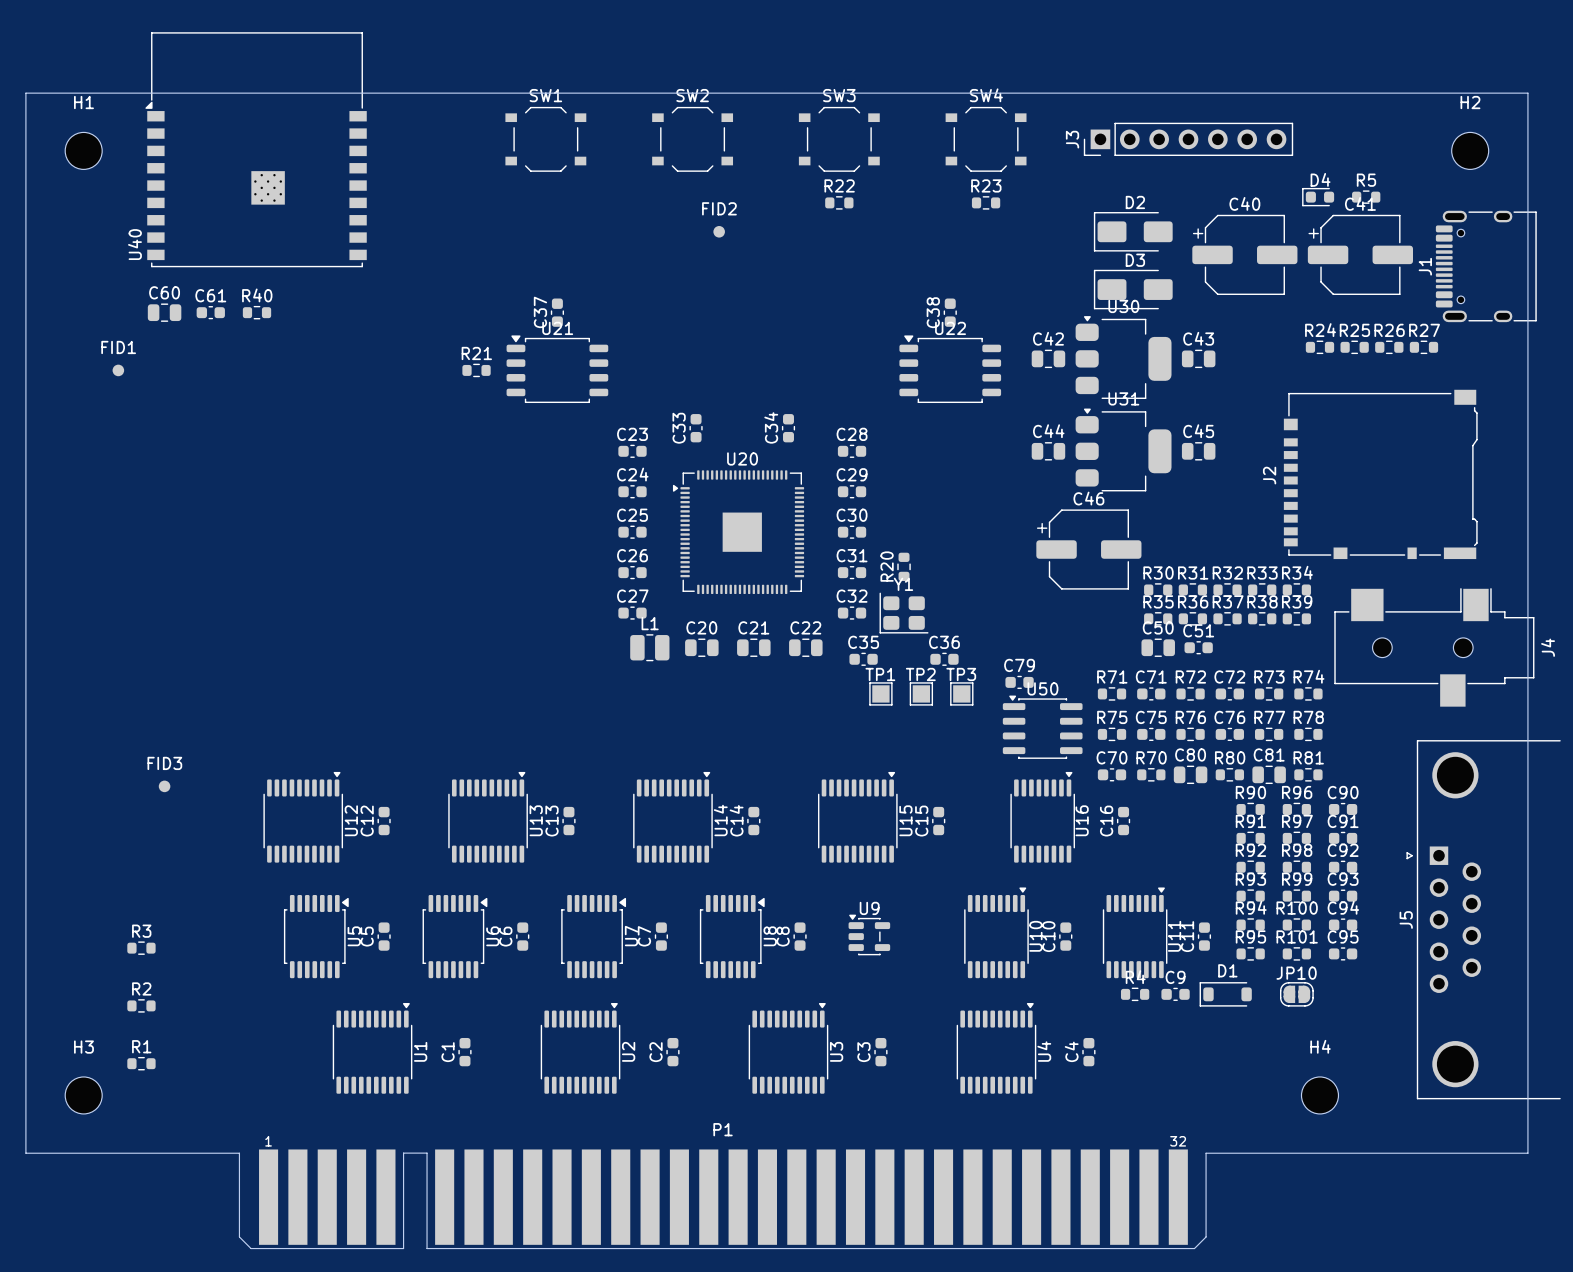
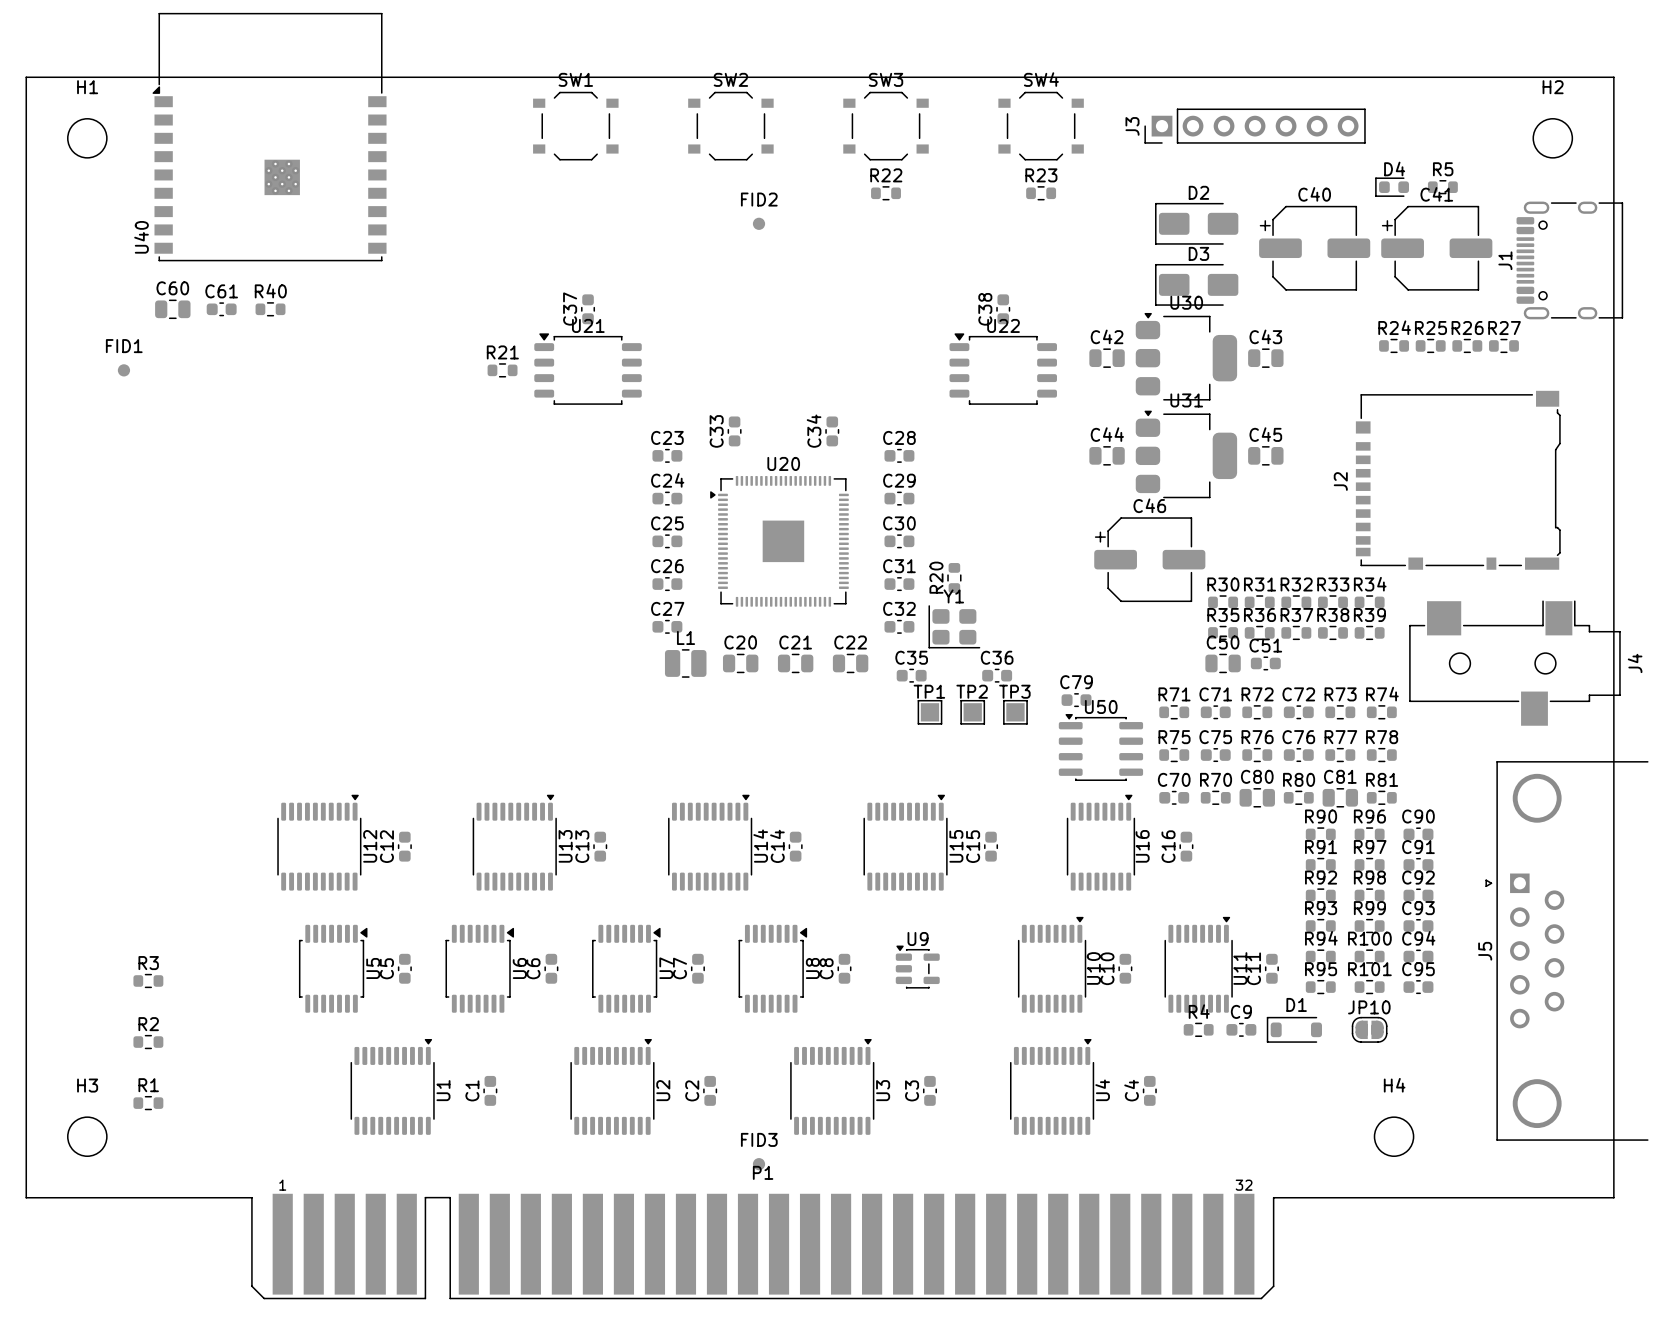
FID3 position: (164, 786) -> (759, 1164)

